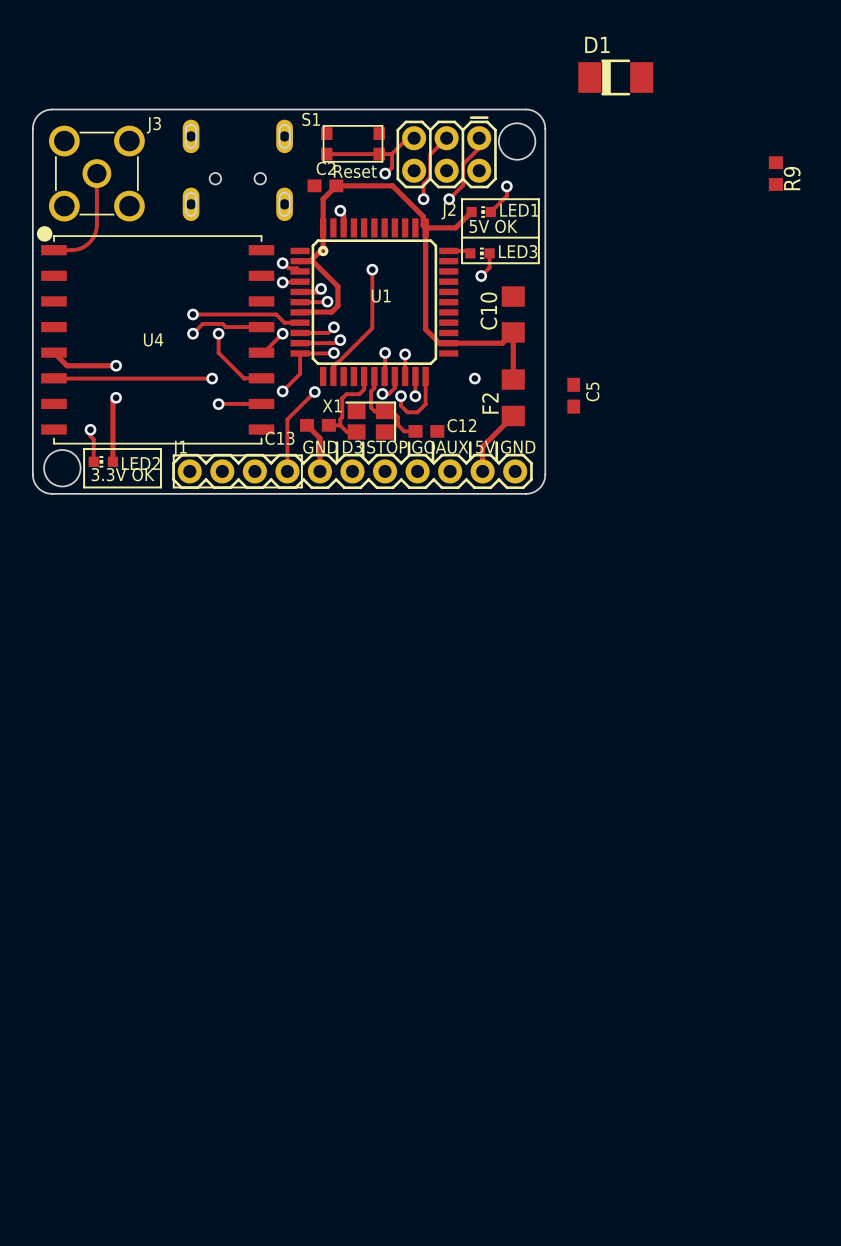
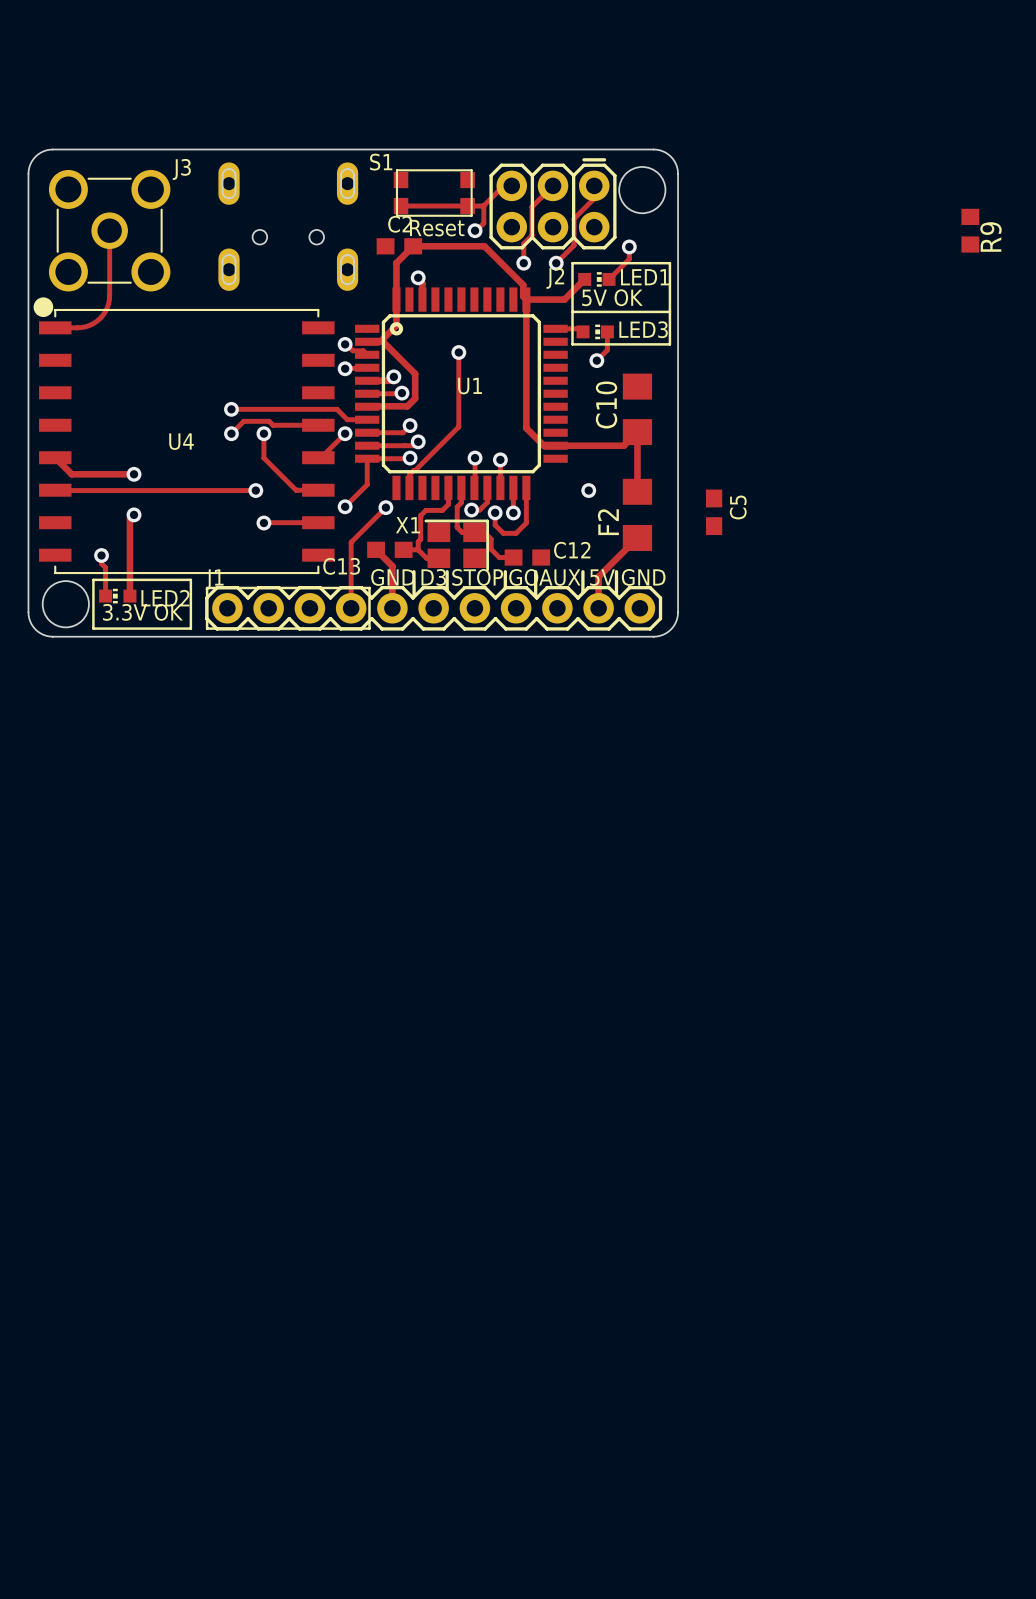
D1: (615, 77) -> none

